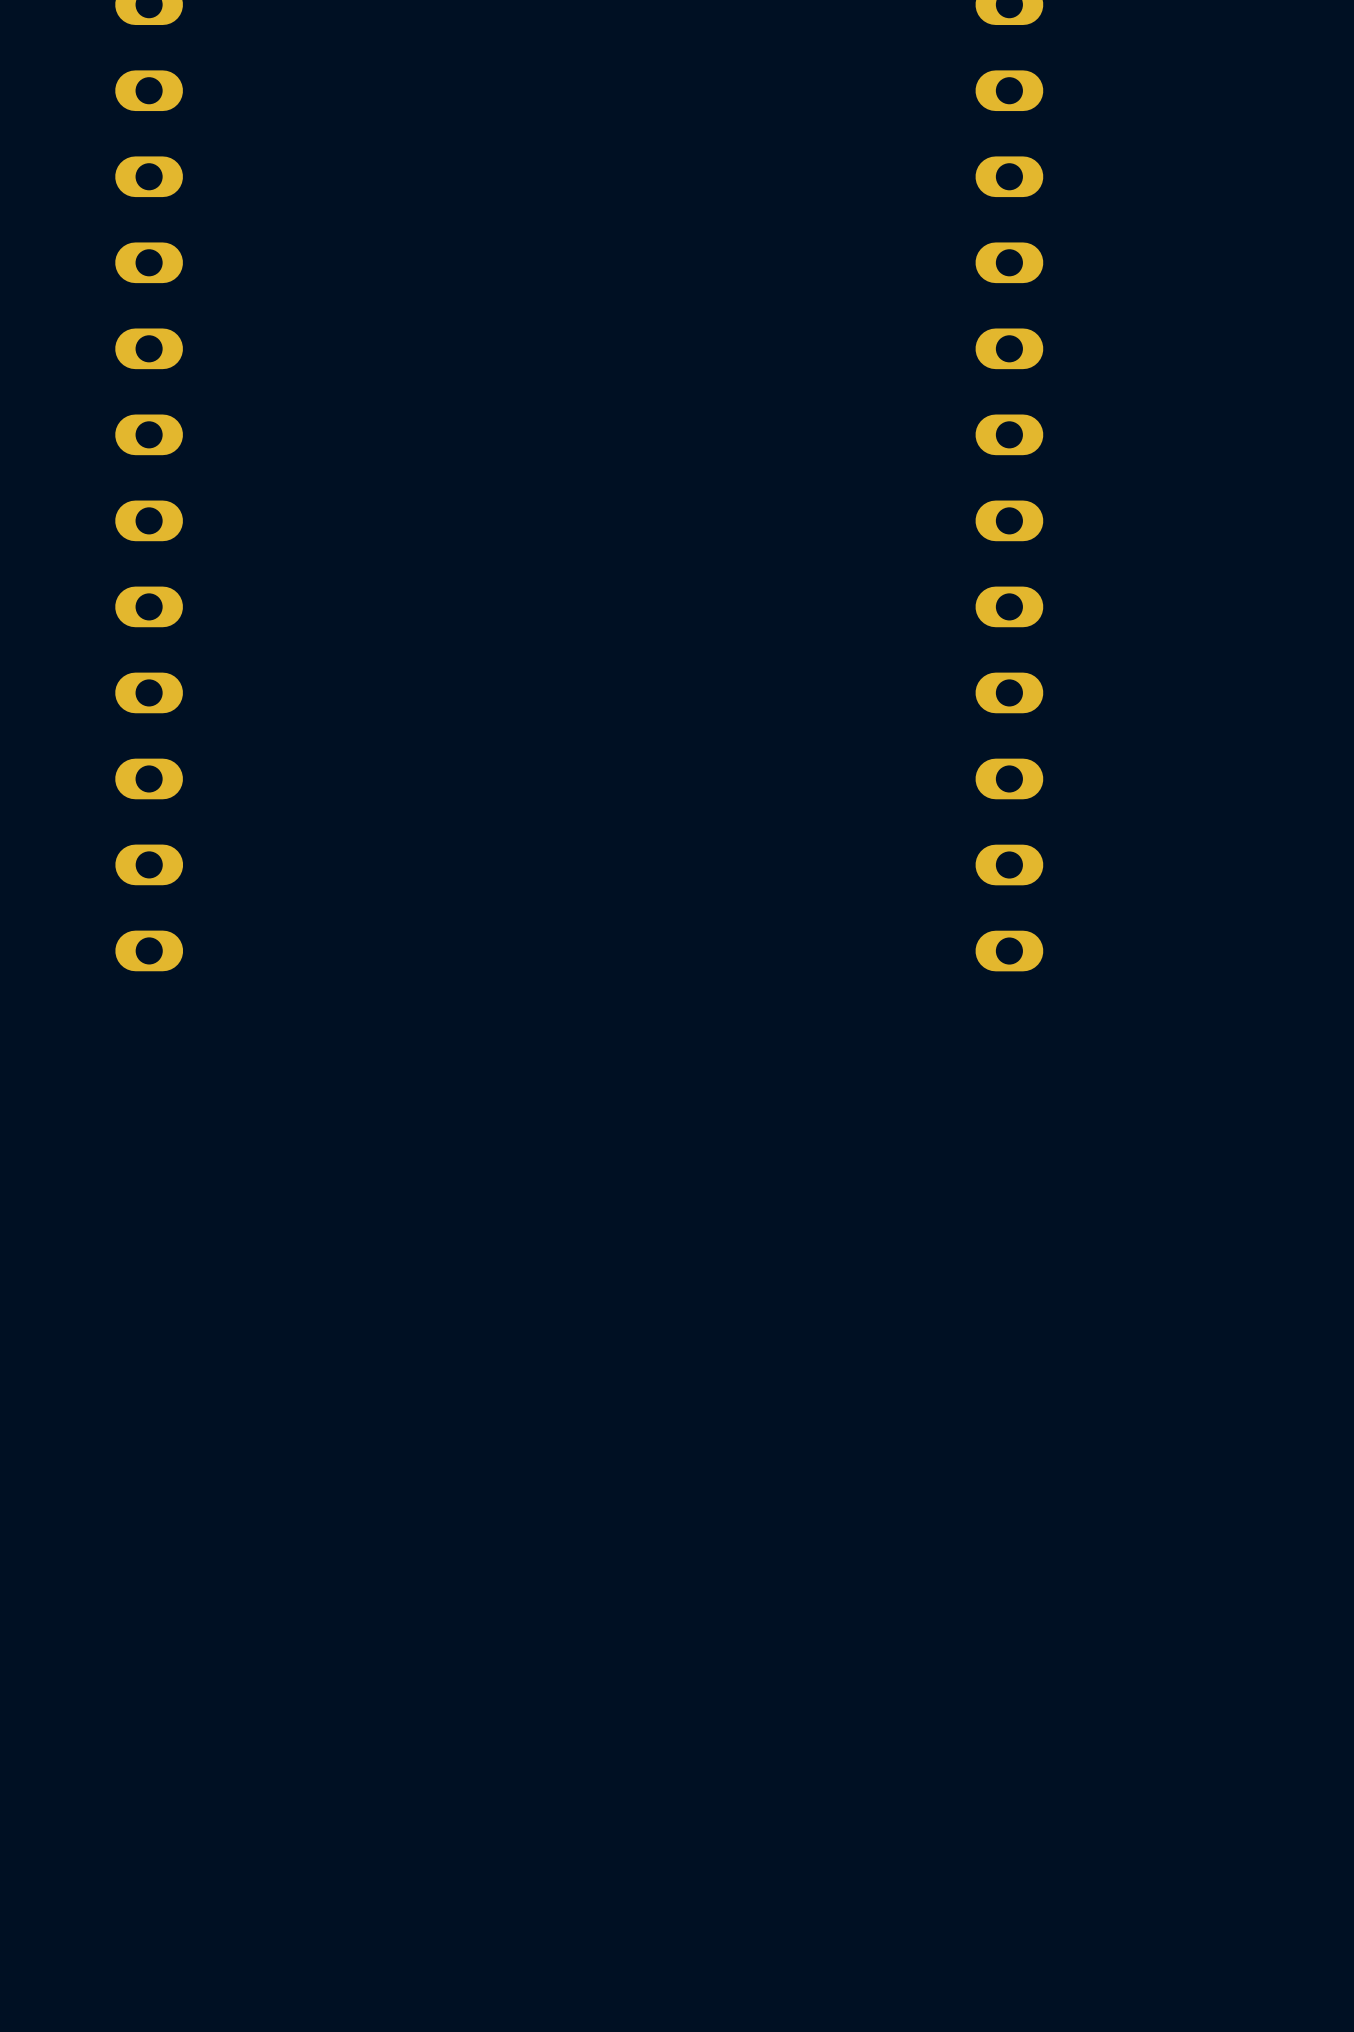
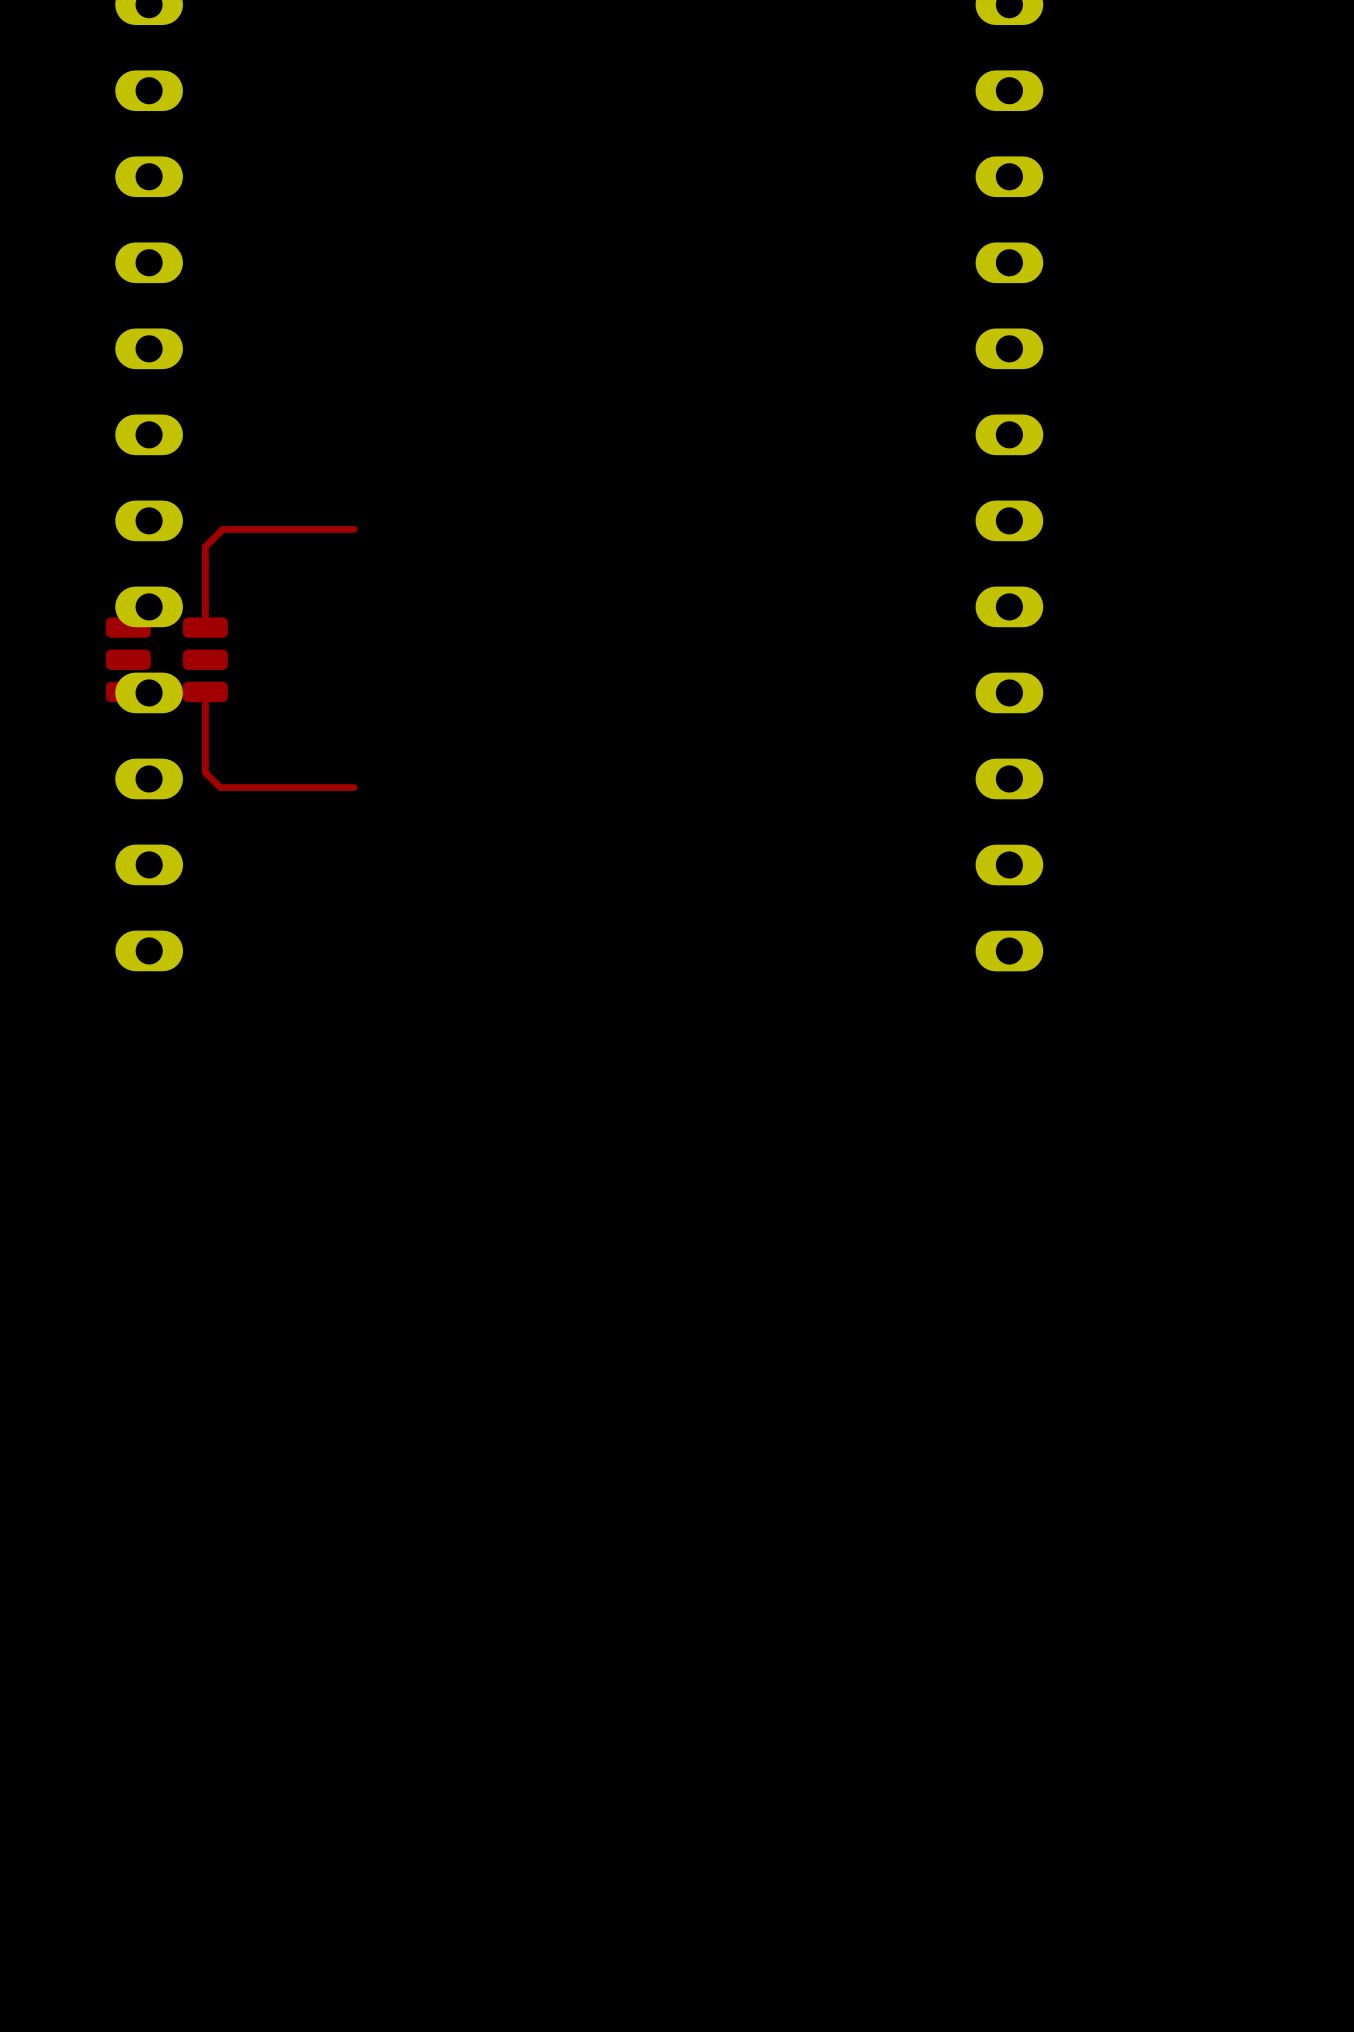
top track: none -> (354, 529) (222, 529) (205, 546) (205, 627)
part: none -> (166, 659)
top track: none -> (205, 691) (205, 772) (220, 787) (354, 787)

